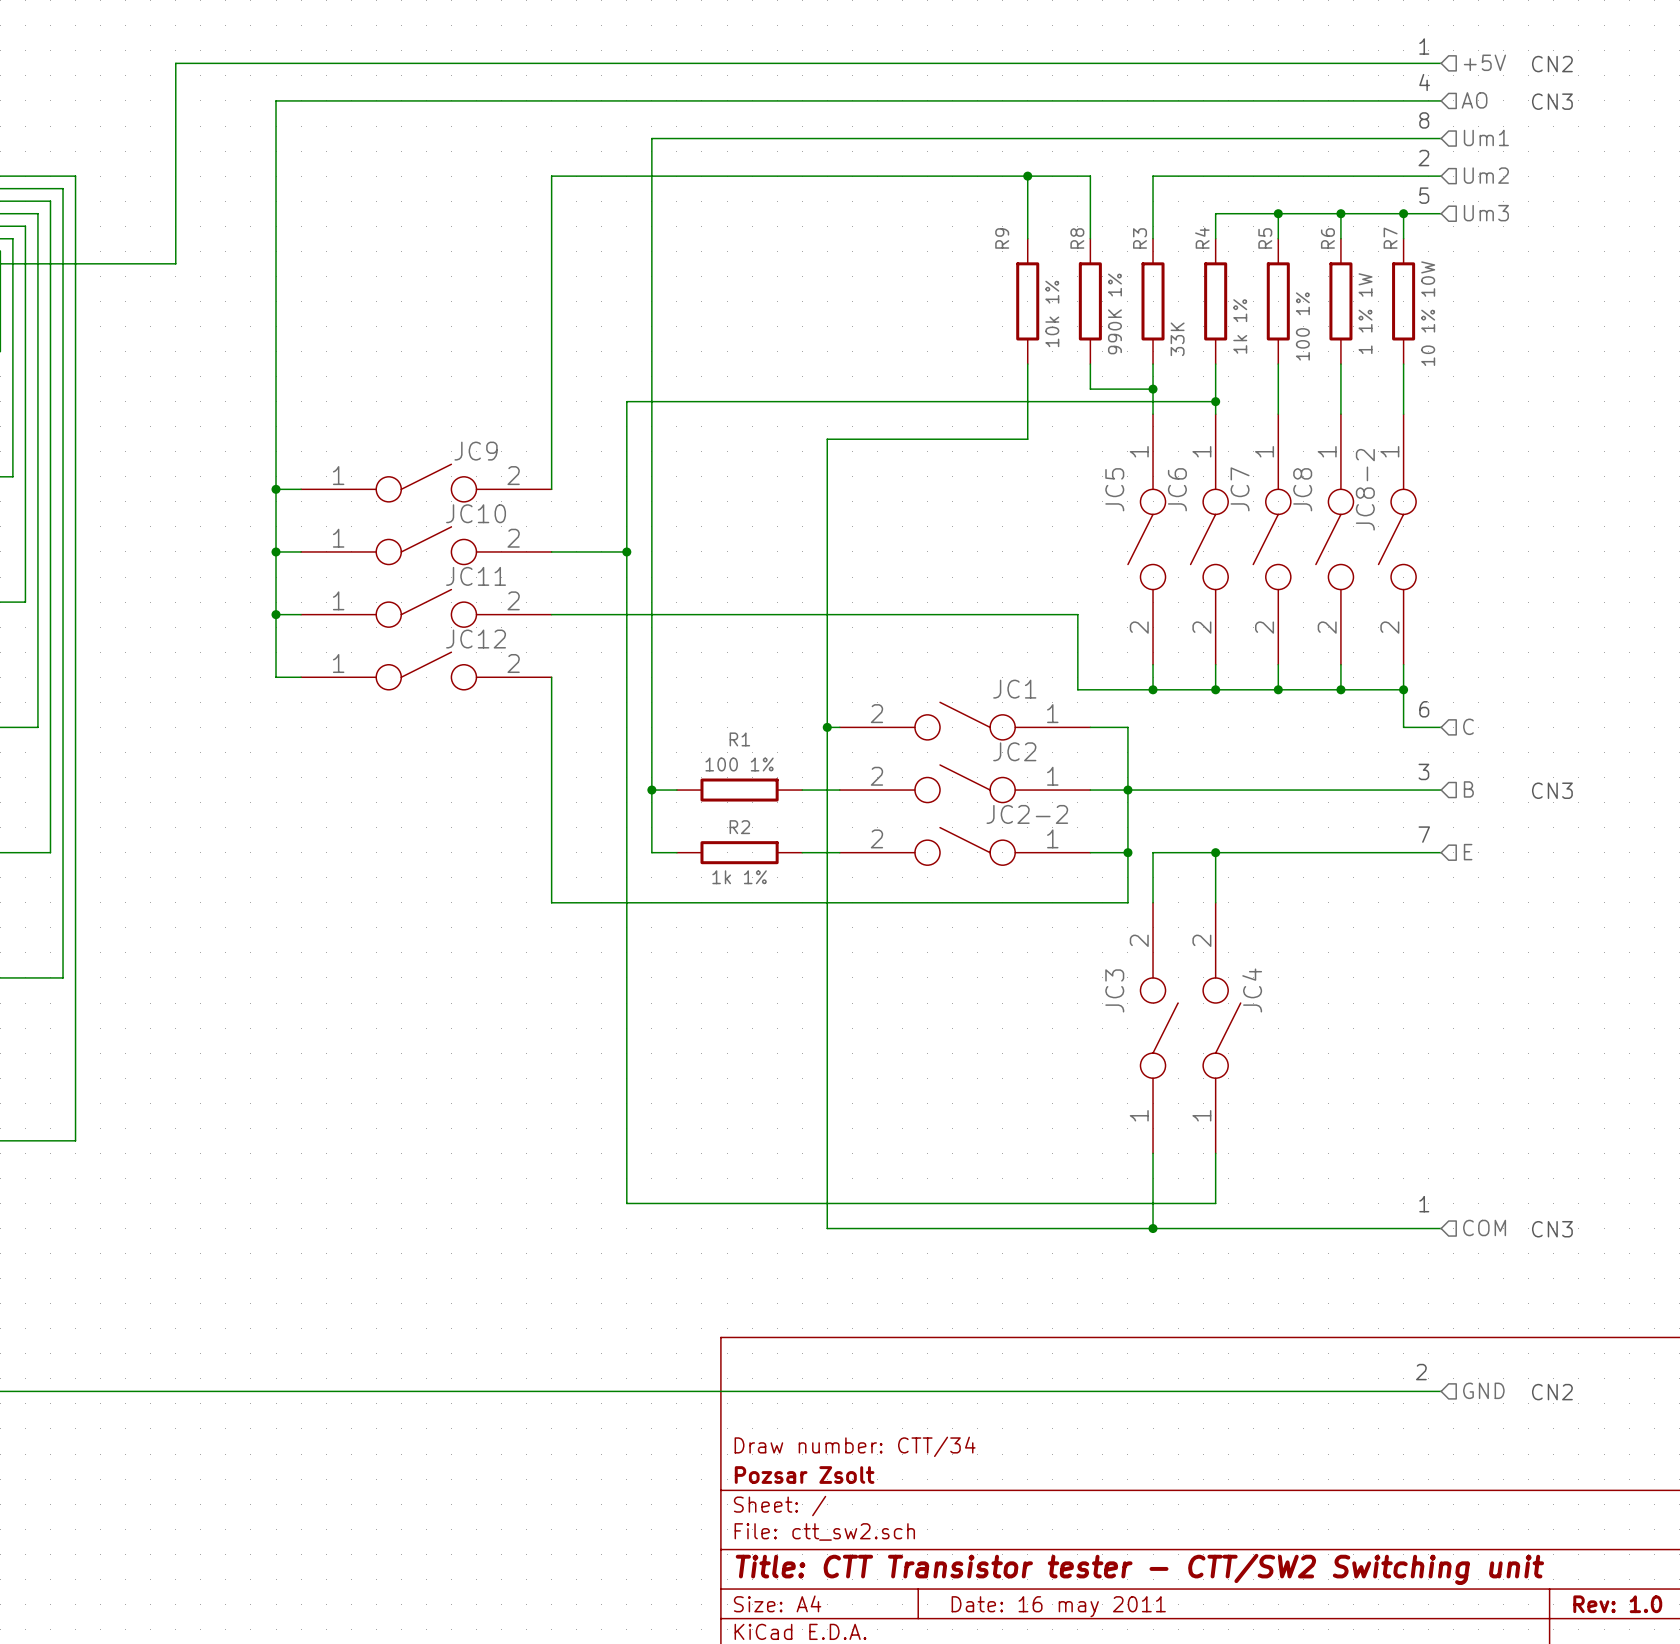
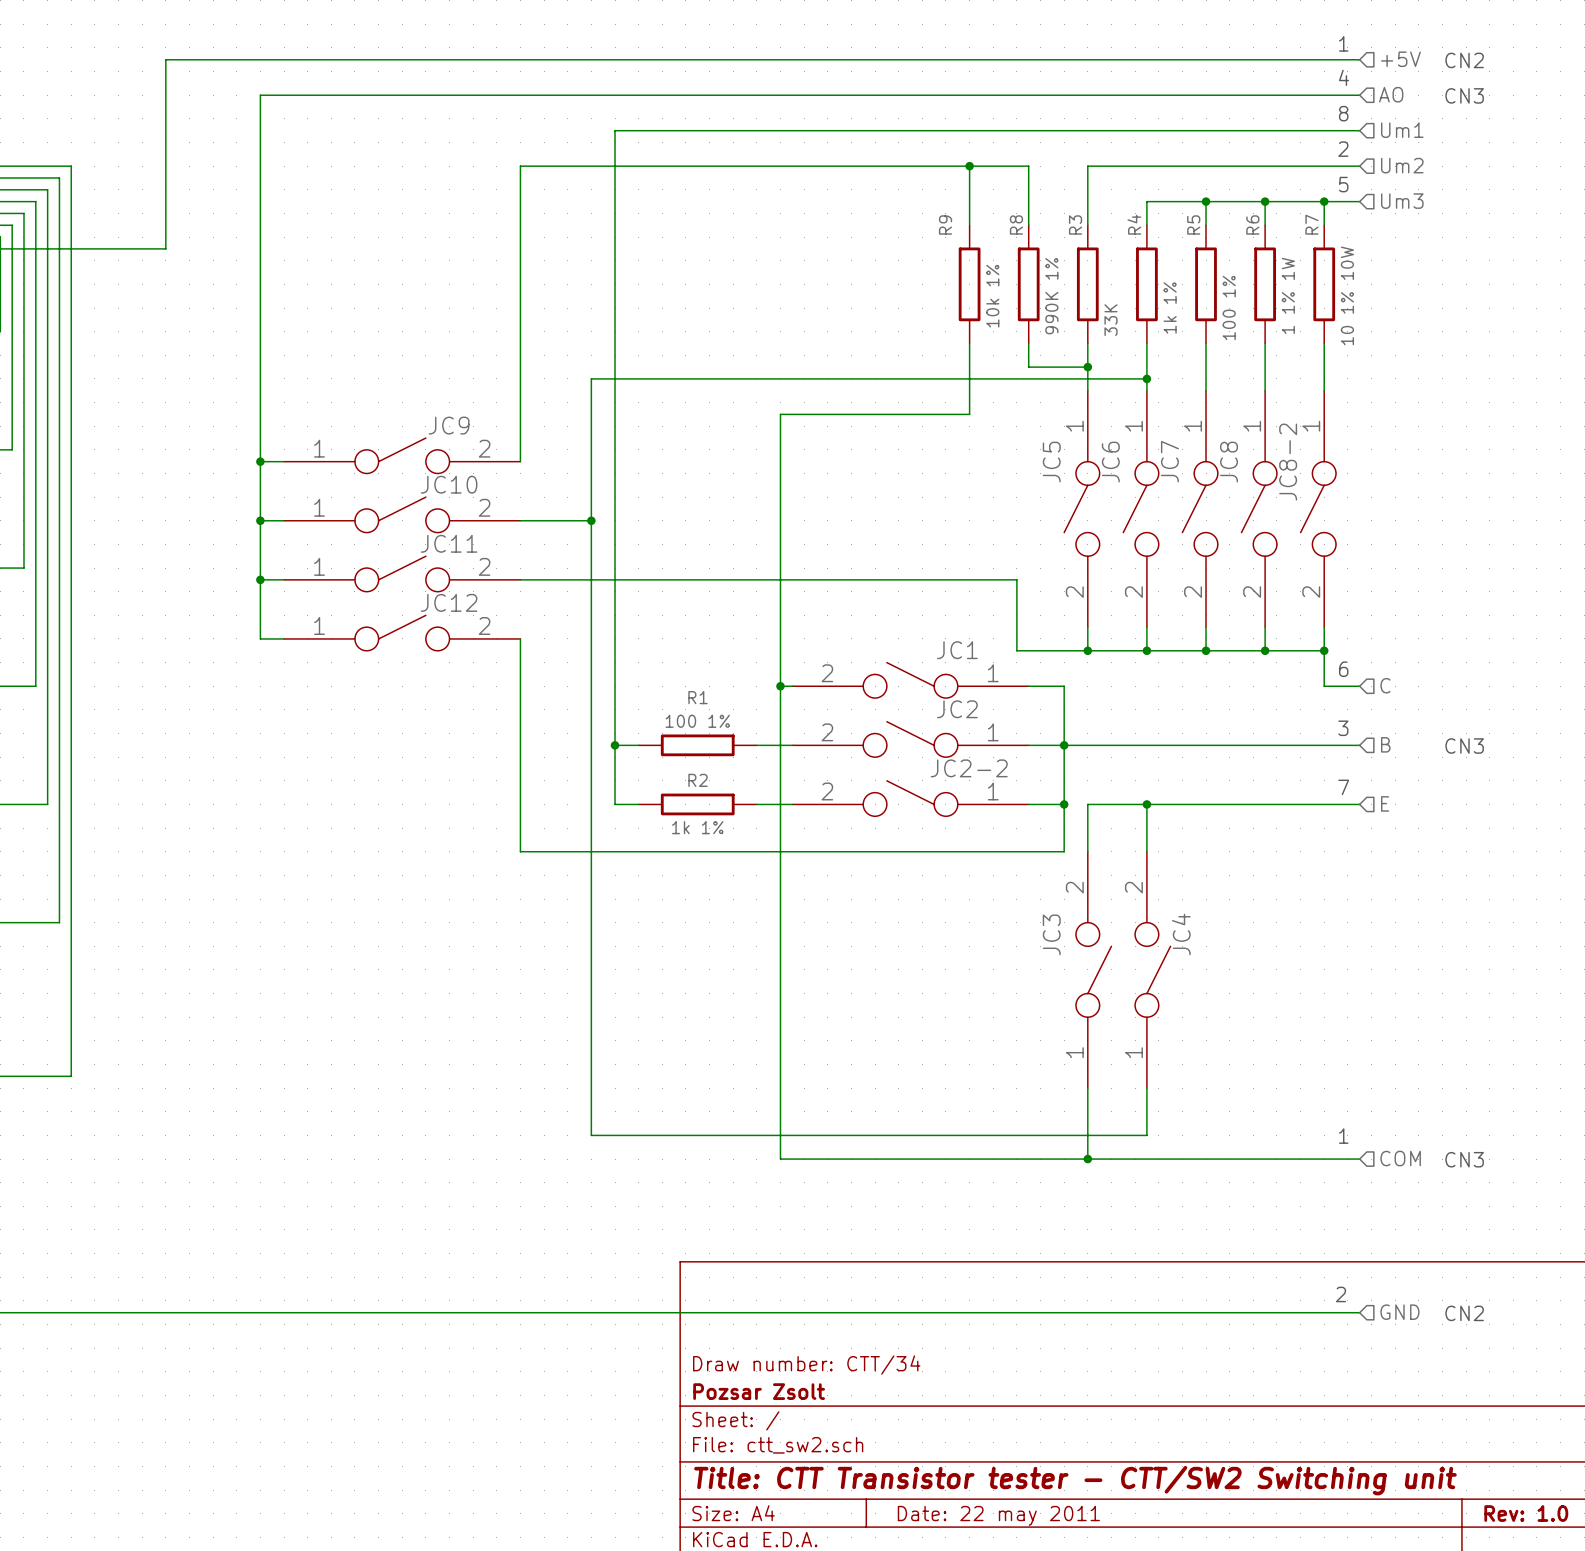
title block: Date: 16 may 2011 (1058, 1606) -> Date: 22 may 2011 (998, 1515)

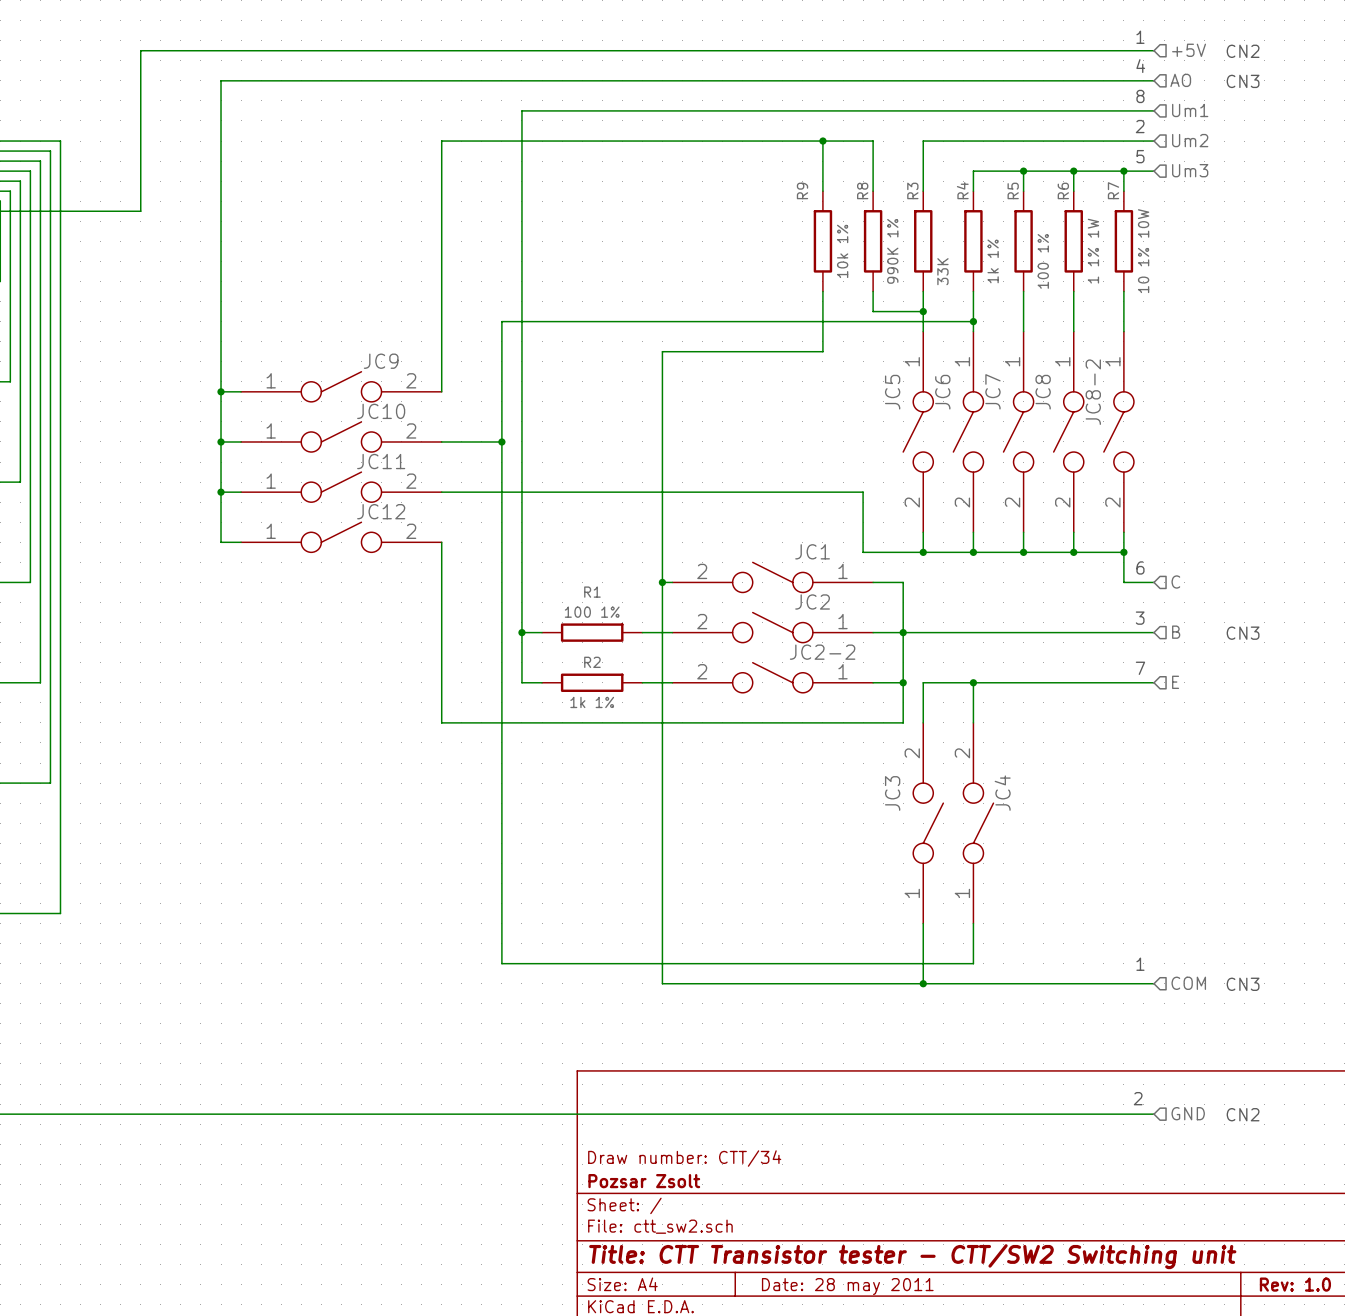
title block: Date: 22 may 2011 (998, 1515) -> Date: 28 may 2011 (847, 1286)

